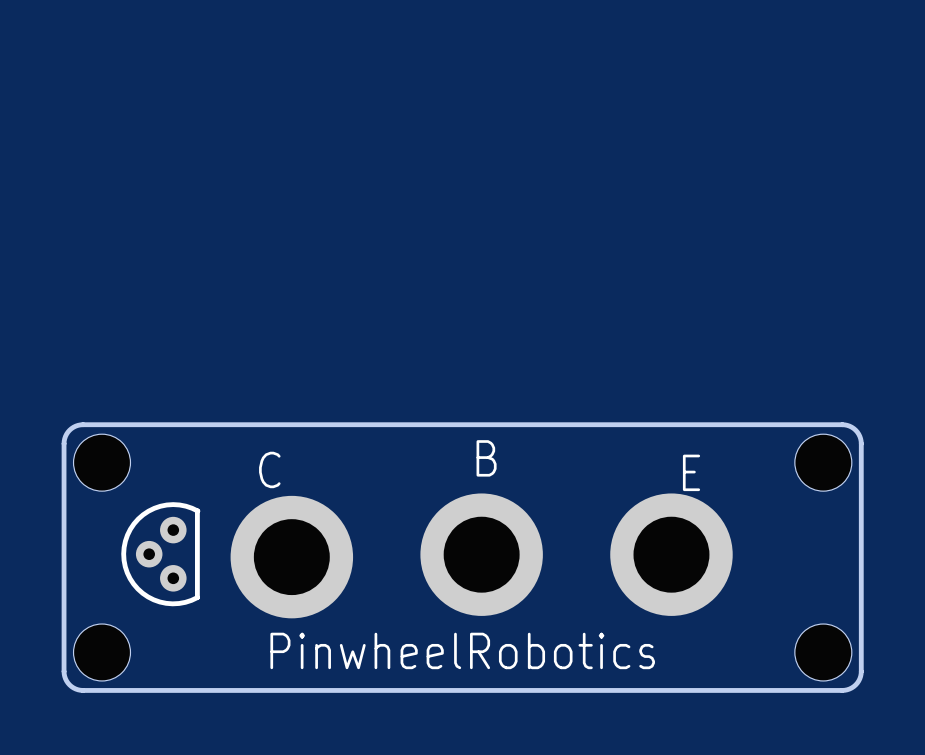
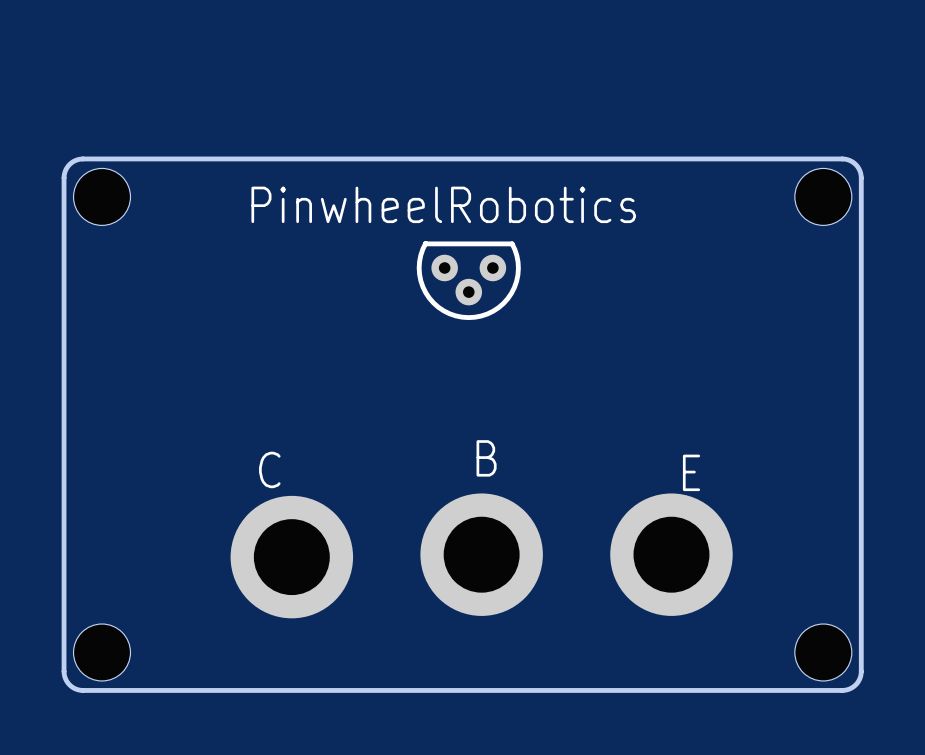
board edge: (64, 443) (69, 430) (83, 424) (842, 424) (855, 430) (861, 443) -> (64, 443) (64, 175) (71, 162) (83, 158) (849, 160) (857, 166) (861, 177) (861, 443)
hole position: (102, 462) -> (102, 196)
hole position: (823, 462) -> (823, 196)
part rotation: 0° (160, 554) -> 90° counterclockwise (468, 280)
part position: (160, 554) -> (468, 280)
text position: PinwheelRobotics (462, 650) -> PinwheelRobotics (443, 204)

